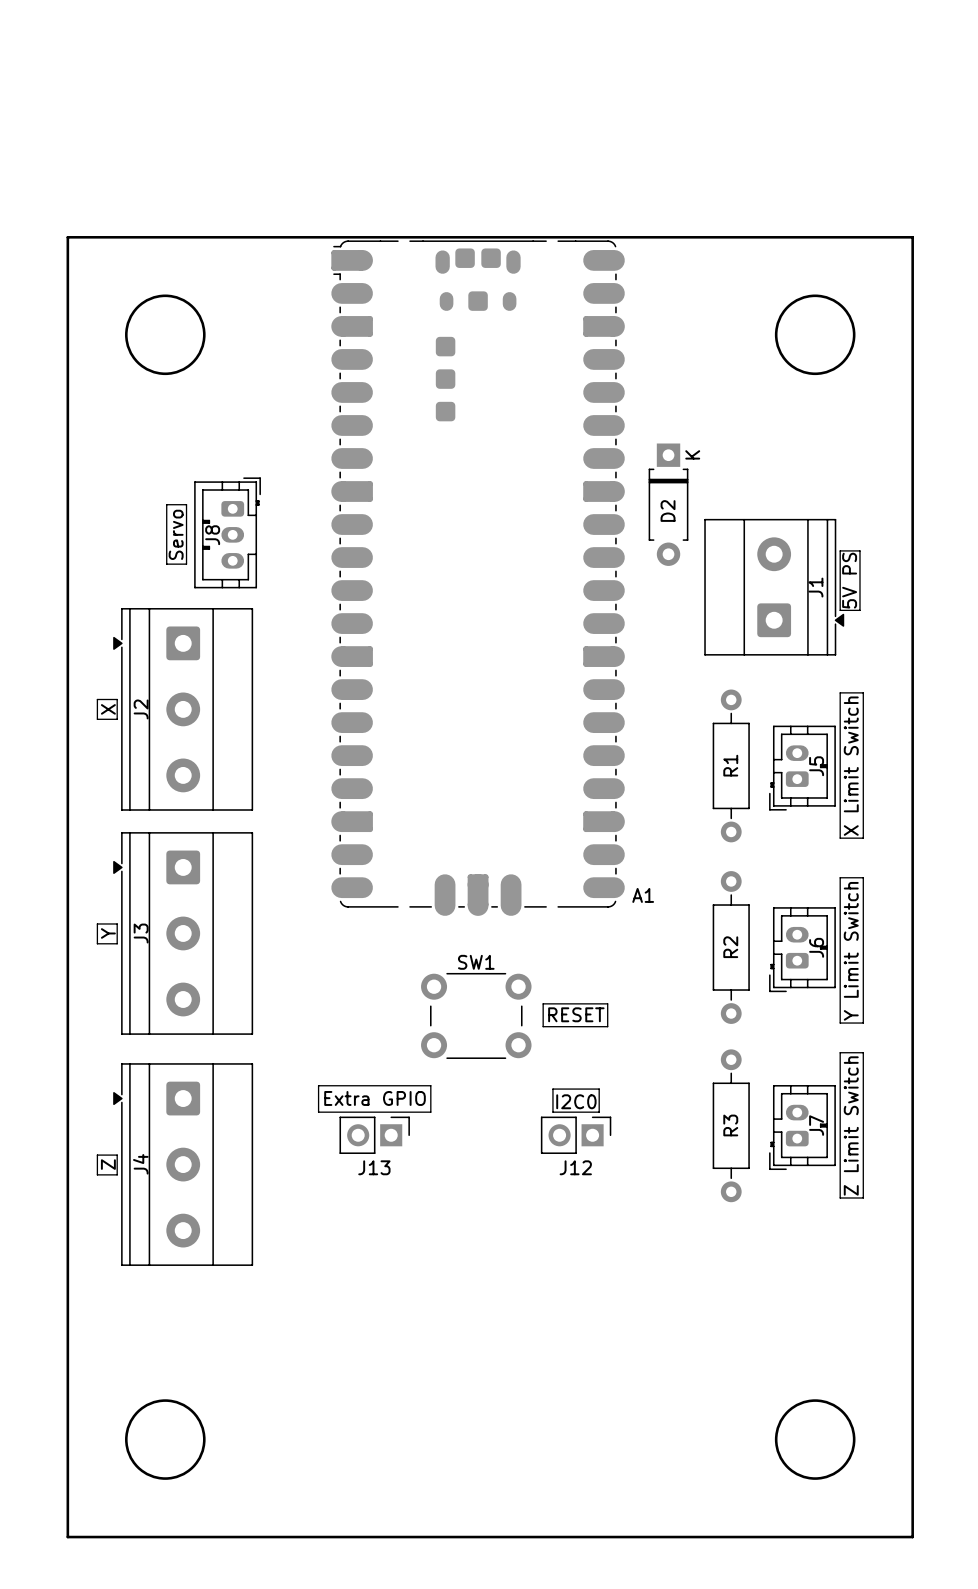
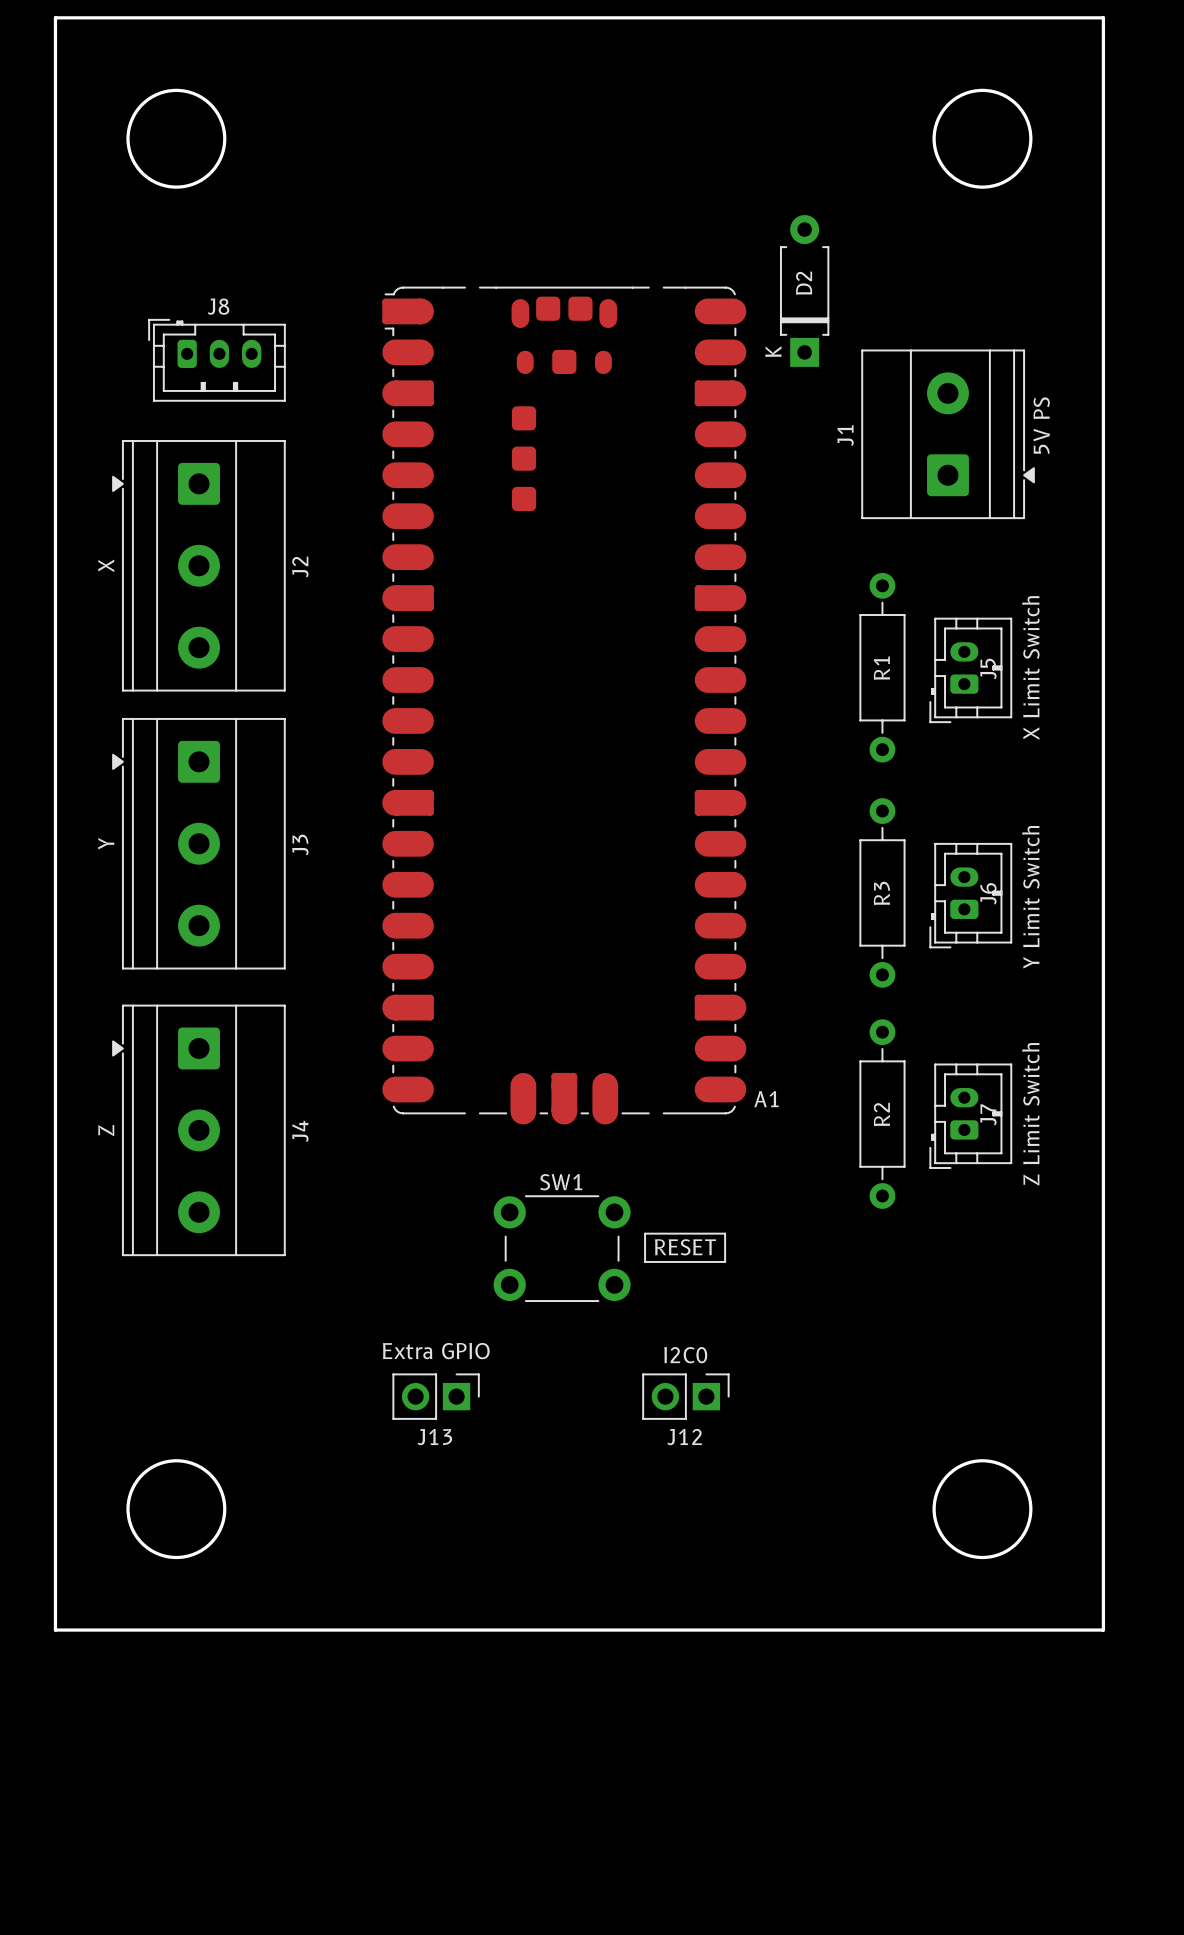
board edge: (67, 237) (912, 237) -> (55, 282) (55, 17) (1103, 17) (1103, 282)
round board edge position: (165, 334) -> (176, 138)
round board edge position: (815, 334) -> (982, 138)
line: (166, 504) (186, 504) (186, 564) (166, 564) (166, 504) -> none
D2 rotation: 0° (668, 504) -> 180° (804, 290)
D2 position: (668, 504) -> (804, 290)
J8 rotation: 0° (227, 532) -> 90° counterclockwise (216, 360)
J8 position: (227, 532) -> (216, 360)
J8 value: Servo (176, 534) -> none
J8 name position: J8 (212, 535) -> J8 (218, 306)
line: (840, 550) (840, 610) (859, 610) (859, 550) (840, 550) -> none
J1 position: (774, 587) -> (948, 434)
J1 name position: J1 (815, 587) -> J1 (845, 435)
line: (840, 692) (840, 838) (863, 838) (863, 692) (840, 692) -> none
line: (97, 699) (97, 719) (117, 719) (117, 699) (97, 699) -> none
J2 name position: J2 (141, 709) -> J2 (300, 567)
J2 position: (183, 709) -> (198, 565)
R1 position: (731, 765) -> (882, 667)
J5 position: (802, 768) -> (970, 670)
line: (840, 877) (840, 1023) (863, 1023) (863, 877) (840, 877) -> none
line: (97, 923) (117, 923) (117, 943) (97, 943) (97, 923) -> none
J3 name position: J3 (141, 933) -> J3 (300, 845)
J3 position: (183, 933) -> (198, 843)
R2 position: (731, 947) -> (882, 1114)
J6 position: (802, 949) -> (970, 895)
line: (840, 1052) (863, 1052) (863, 1197) (840, 1197) (840, 1052) -> none
line: (318, 1085) (430, 1085) (430, 1112) (318, 1112) (318, 1085) -> none
line: (552, 1089) (599, 1089) (599, 1112) (552, 1112) (552, 1089) -> none
R3 position: (731, 1125) -> (882, 892)
J7 position: (802, 1127) -> (970, 1116)
line: (97, 1155) (97, 1174) (117, 1174) (117, 1155) (97, 1155) -> none
J4 name position: J4 (140, 1164) -> J4 (300, 1131)
J4 position: (183, 1164) -> (198, 1130)
board edge: (67, 1323) (67, 1537) (912, 1537) (912, 1323) -> (55, 1630) (1103, 1630)
round board edge position: (165, 1439) -> (176, 1509)
round board edge position: (815, 1439) -> (982, 1509)

